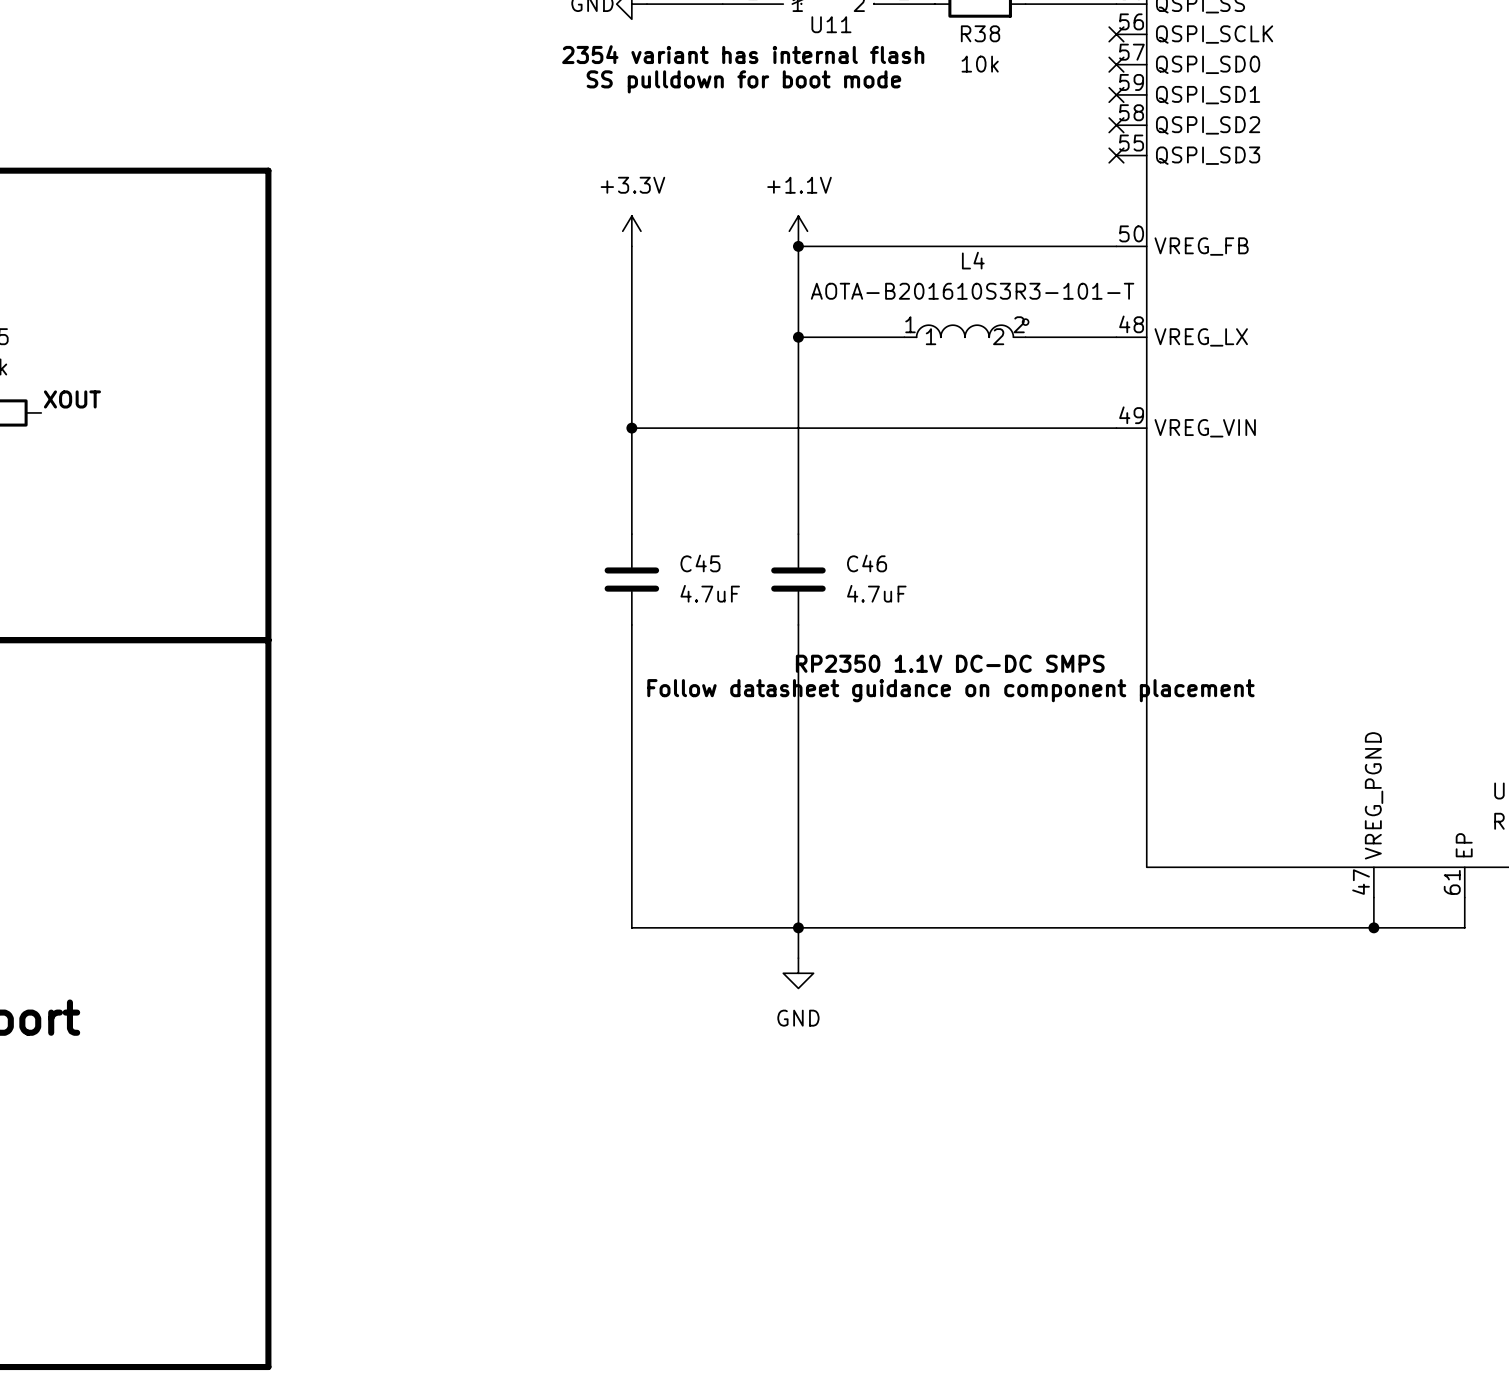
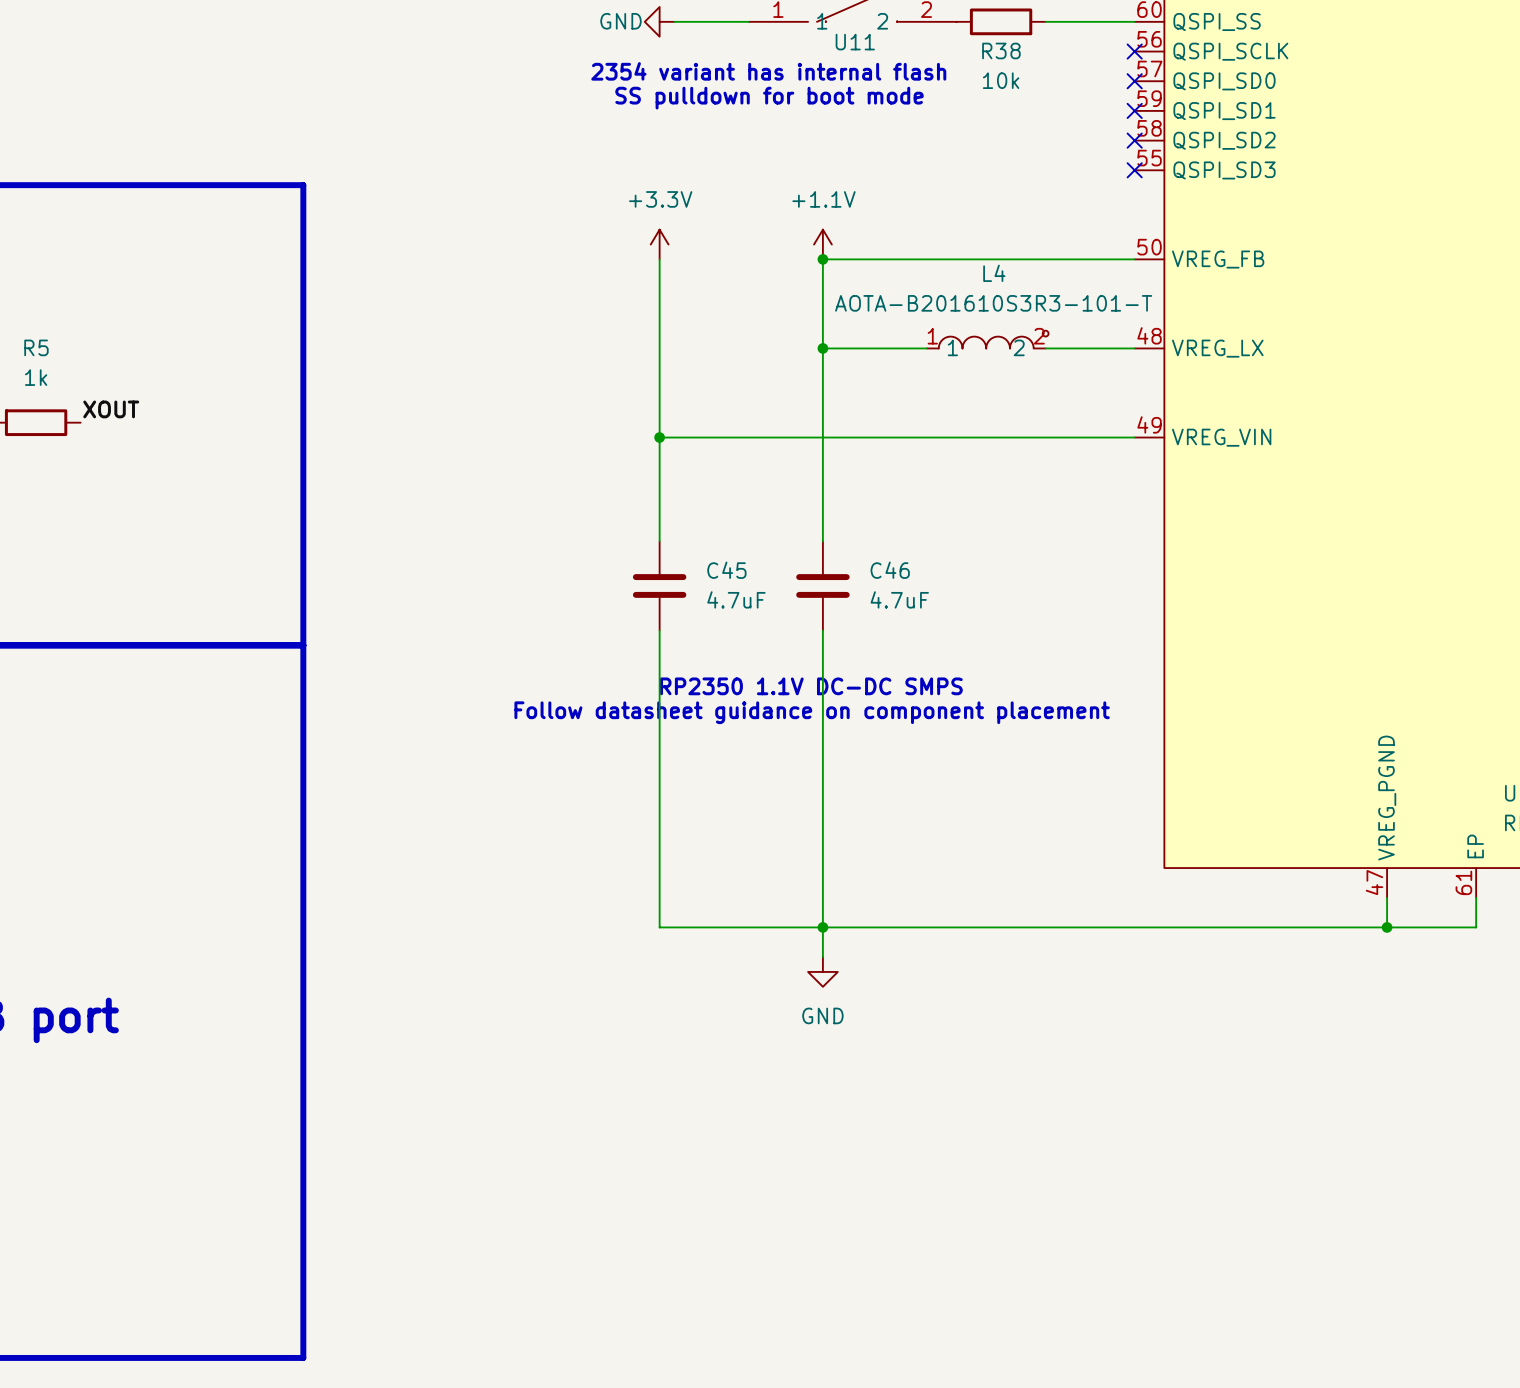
text position: RP2350 1.1V DC-DC SMPS (950, 663) -> RP2350 1.1V DC-DC SMPS (811, 686)
text position: Follow datasheet guidance on component placement (950, 690) -> Follow datasheet guidance on component placement (812, 712)

